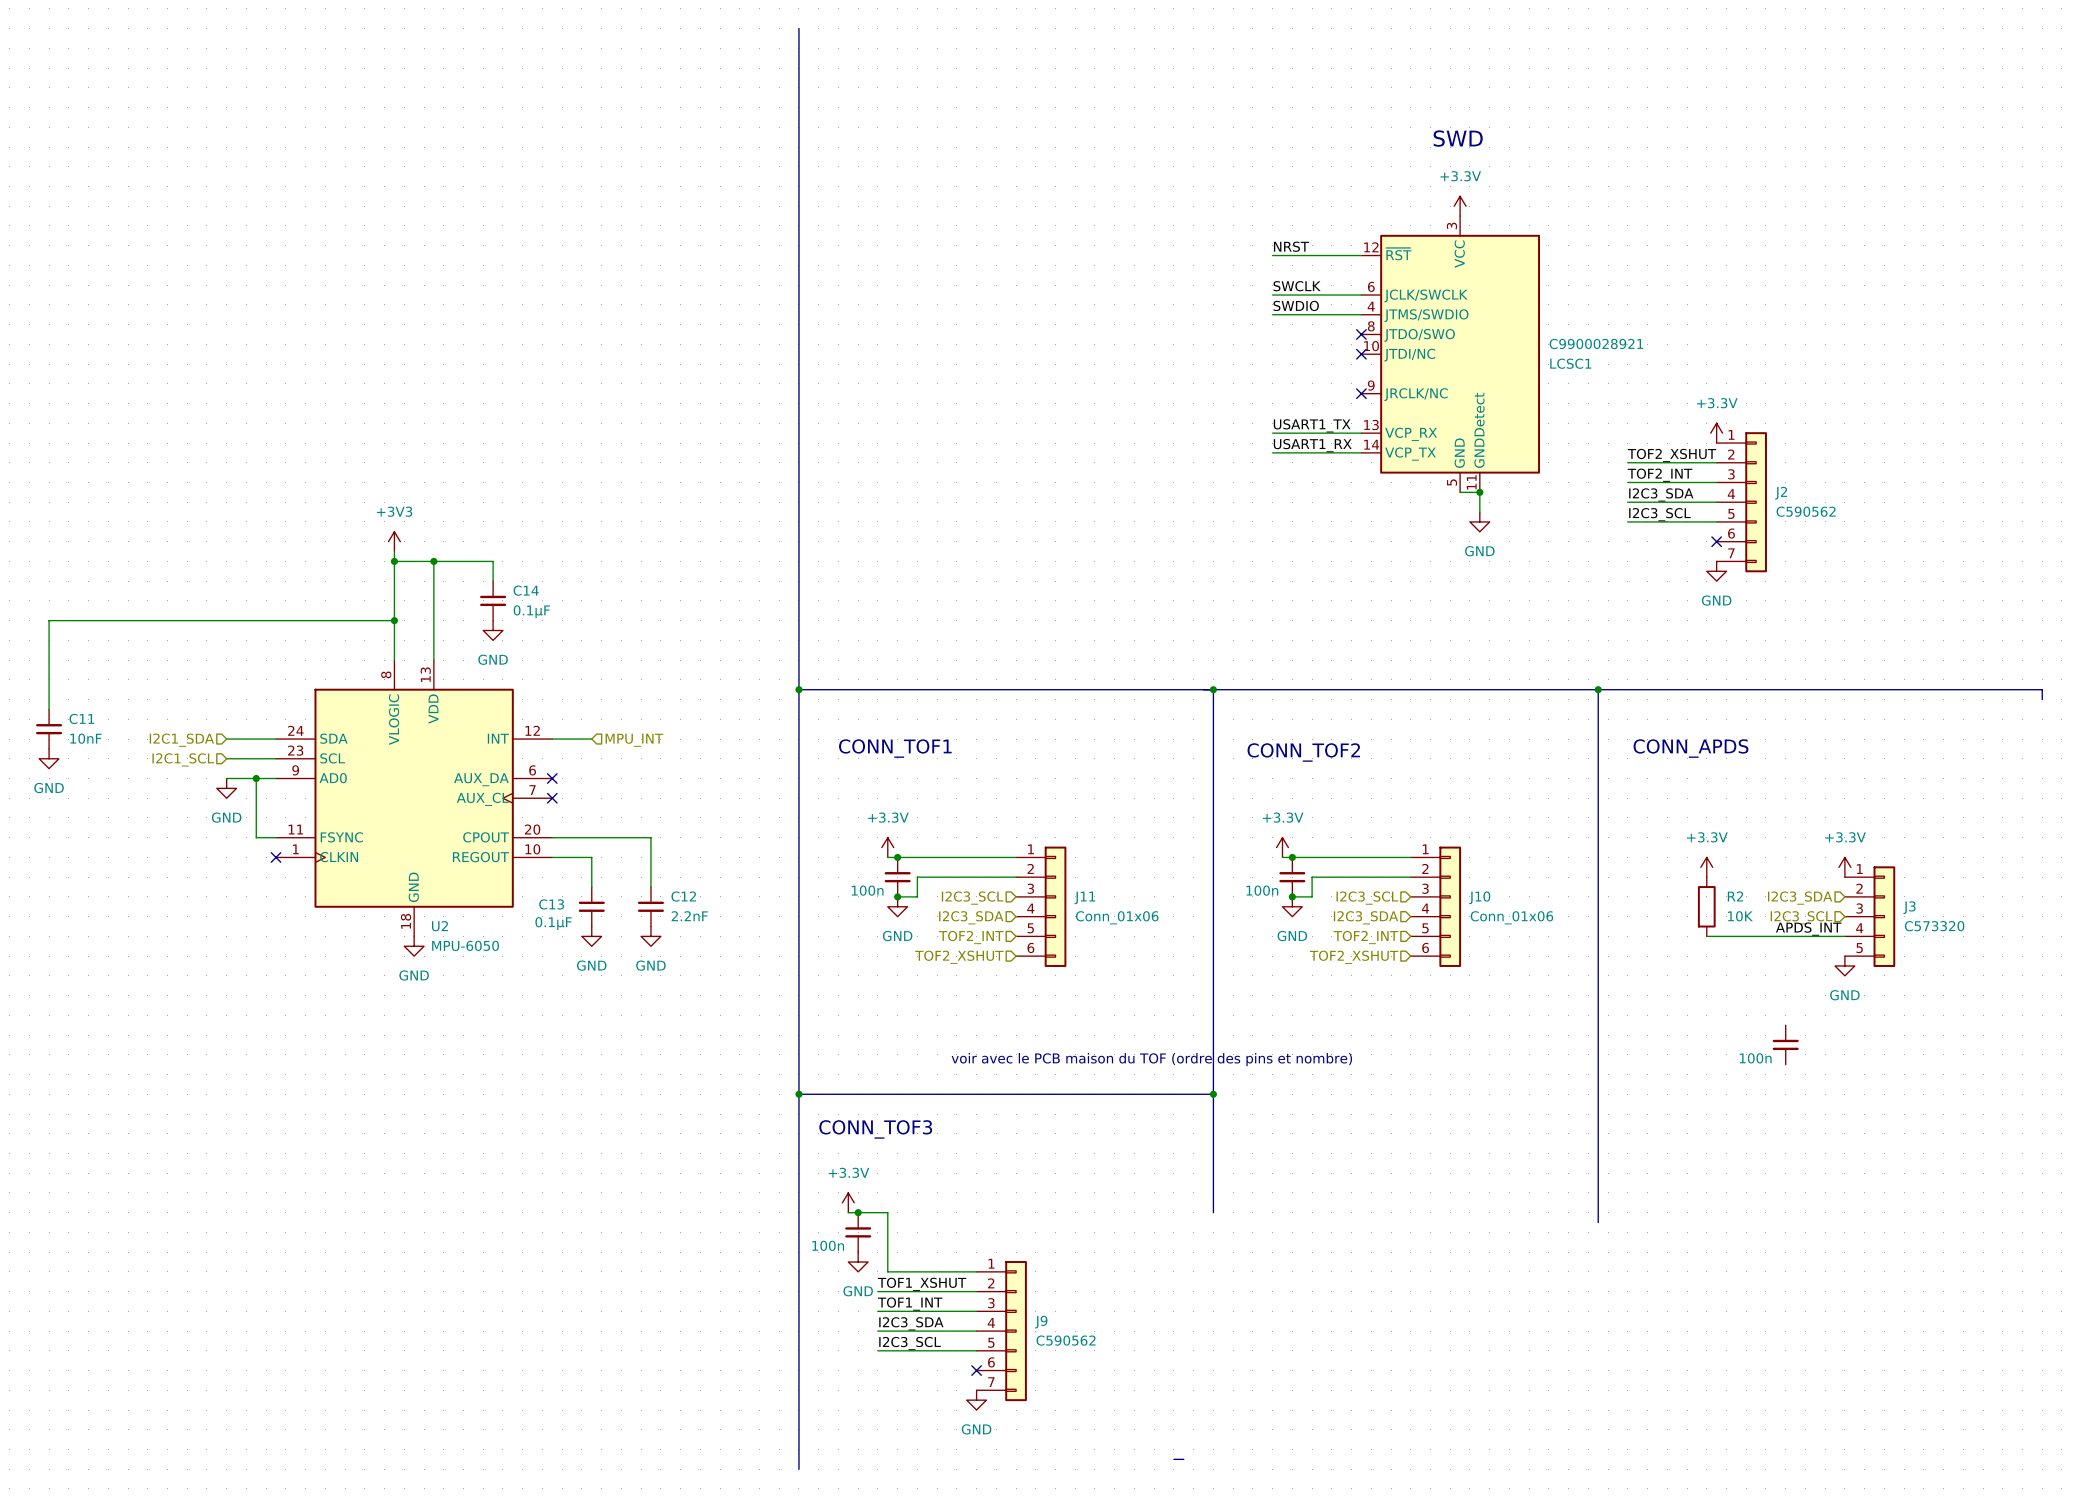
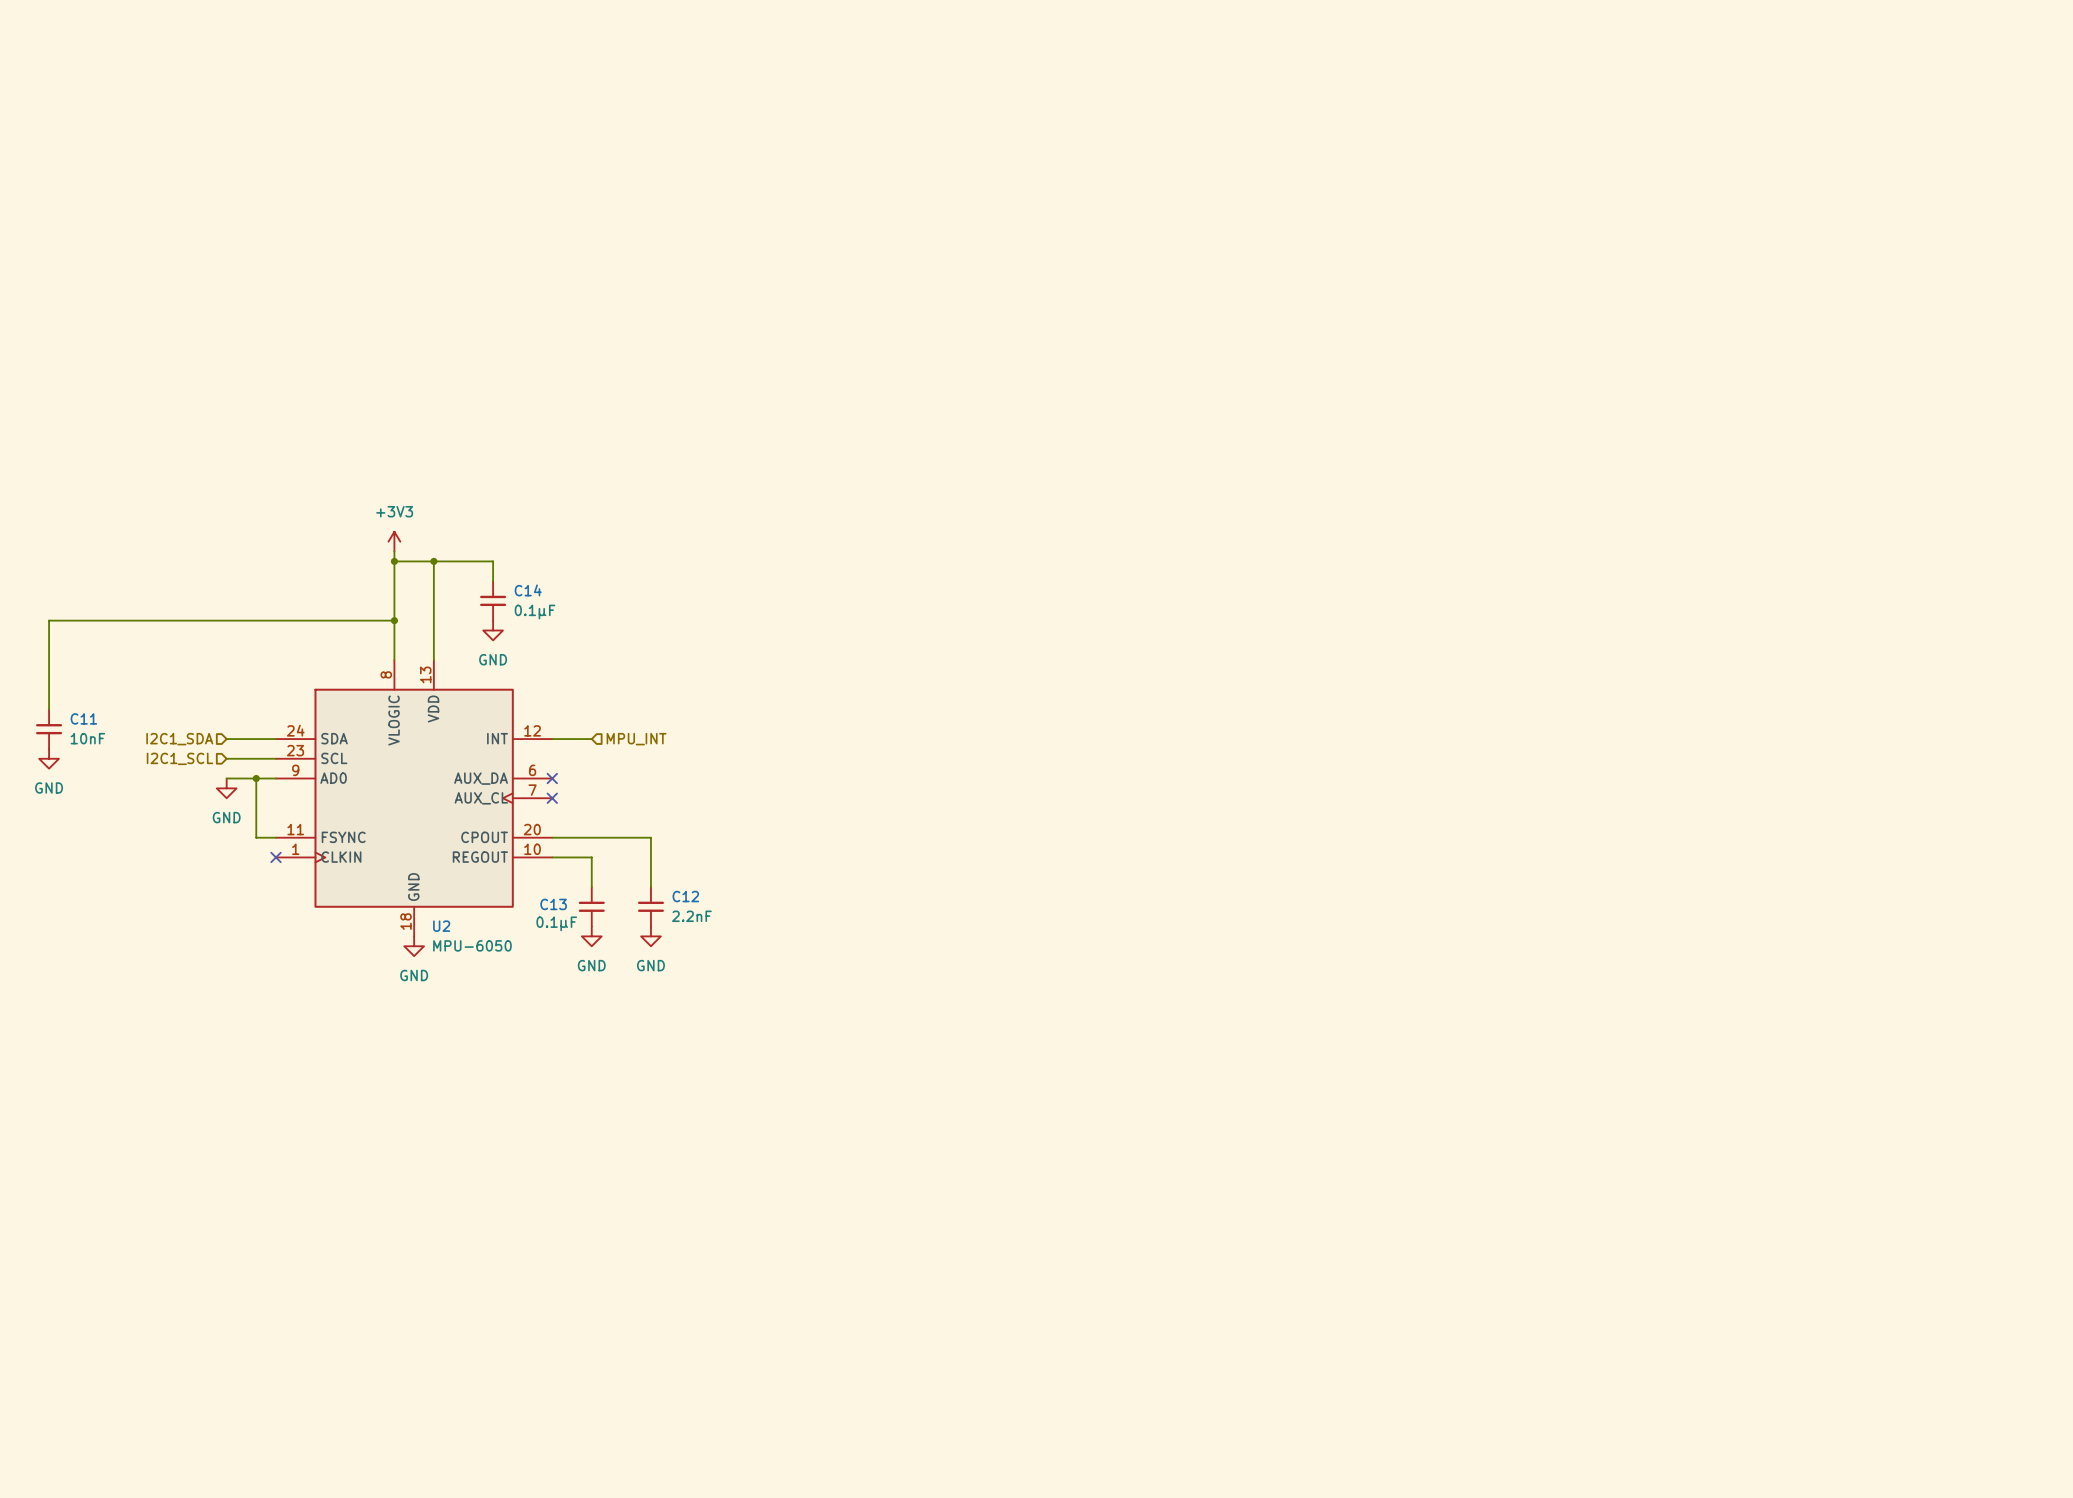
bus: (798, 28) (798, 1469) -> none
text: SWD (1458, 138) -> none
power symbol: +3.3V (1460, 206) -> none
label: NRST (1291, 246) -> none
wire: (1272, 255) (1361, 255) -> none
label: SWCLK (1297, 286) -> none
wire: (1272, 295) (1361, 295) -> none
label: SWDIO (1296, 305) -> none
wire: (1272, 314) (1361, 314) -> none
no-connect mark: (1361, 334) -> none
no-connect mark: (1361, 354) -> none
LCSC1: C9900028921 (1450, 354) -> none
no-connect mark: (1361, 393) -> none
label: USART1_TX (1312, 425) -> none
wire: (1272, 433) (1361, 433) -> none
power symbol: +3.3V (1716, 433) -> none
label: USART1_RX (1312, 445) -> none
wire: (1272, 452) (1361, 452) -> none
label: TOF2_XSHUT (1671, 455) -> none
wire: (1627, 462) (1716, 462) -> none
label: TOF2_INT (1660, 475) -> none
wire: (1627, 482) (1716, 482) -> none
wire: (1460, 492) (1479, 492) (1479, 512) -> none
junction: (1479, 492) -> none
label: I2C3_SDA (1661, 494) -> none
wire: (1627, 502) (1716, 502) -> none
J2: C590562 (1741, 502) -> none
label: I2C3_SCL (1659, 514) -> none
power symbol: GND (1479, 521) -> none
wire: (1627, 521) (1716, 521) -> none
no-connect mark: (1716, 541) -> none
power symbol: GND (1716, 571) -> none
bus: (798, 689) (2042, 689) (2042, 699) -> none
junction: (798, 689) -> none
bus: (1213, 689) (1213, 1212) -> none
junction: (1213, 689) -> none
bus: (1598, 689) (1598, 1222) -> none
junction: (1598, 689) -> none
text: CONN_TOF1 (895, 748) -> none
text: CONN_APDS (1690, 748) -> none
text: CONN_TOF2 (1303, 752) -> none
power symbol: +3.3V (887, 847) -> none
power symbol: +3.3V (1282, 847) -> none
wire: (887, 857) (1016, 857) -> none
junction: (897, 857) -> none
wire: (1282, 857) (1410, 857) -> none
junction: (1292, 857) -> none
power symbol: +3.3V (1706, 867) -> none
power symbol: +3.3V (1844, 867) -> none
part: 100n (897, 877) -> none
wire: (1016, 877) (917, 877) (917, 896) (897, 896) -> none
part: 100n (1292, 877) -> none
wire: (1410, 877) (1312, 877) (1312, 896) (1292, 896) -> none
junction: (897, 896) -> none
junction: (1292, 896) -> none
hierarchical label: I2C3_SCL (972, 898) -> none
hierarchical label: I2C3_SCL (1367, 898) -> none
hierarchical label: I2C3_SDA (1800, 898) -> none
power symbol: GND (897, 906) -> none
J11: Conn_01x06 (1041, 906) -> none
power symbol: GND (1292, 906) -> none
J10: Conn_01x06 (1435, 906) -> none
R2: 10K (1706, 906) -> none
J3: C573320 (1870, 916) -> none
hierarchical label: I2C3_SDA (971, 917) -> none
hierarchical label: I2C3_SDA (1365, 917) -> none
hierarchical label: I2C3_SCL (1801, 917) -> none
label: APDS_INT (1808, 929) -> none
wire: (1706, 936) (1844, 936) -> none
hierarchical label: TOF2_INT (971, 937) -> none
hierarchical label: TOF2_INT (1365, 937) -> none
hierarchical label: TOF2_XSHUT (959, 957) -> none
hierarchical label: TOF2_XSHUT (1354, 957) -> none
power symbol: GND (1844, 965) -> none
part: 100n (1785, 1044) -> none
text: voir avec le PCB maison du TOF (ordre des pins et nombre) (1151, 1059) -> none
bus: (798, 1094) (1213, 1094) -> none
junction: (798, 1094) -> none
junction: (1213, 1094) -> none
text: CONN_TOF3 (875, 1129) -> none
power symbol: +3.3V (848, 1202) -> none
wire: (848, 1212) (887, 1212) (887, 1271) (976, 1271) -> none
junction: (858, 1212) -> none
part: 100n (858, 1232) -> none
power symbol: GND (858, 1262) -> none
label: TOF1_XSHUT (922, 1284) -> none
wire: (877, 1291) (976, 1291) -> none
label: TOF1_INT (910, 1304) -> none
wire: (877, 1311) (976, 1311) -> none
label: I2C3_SDA (911, 1323) -> none
wire: (877, 1331) (976, 1331) -> none
J9: C590562 (1001, 1331) -> none
label: I2C3_SCL (910, 1343) -> none
wire: (877, 1350) (976, 1350) -> none
no-connect mark: (976, 1370) -> none
power symbol: GND (976, 1400) -> none
bus: (1173, 1459) (1183, 1459) -> none

